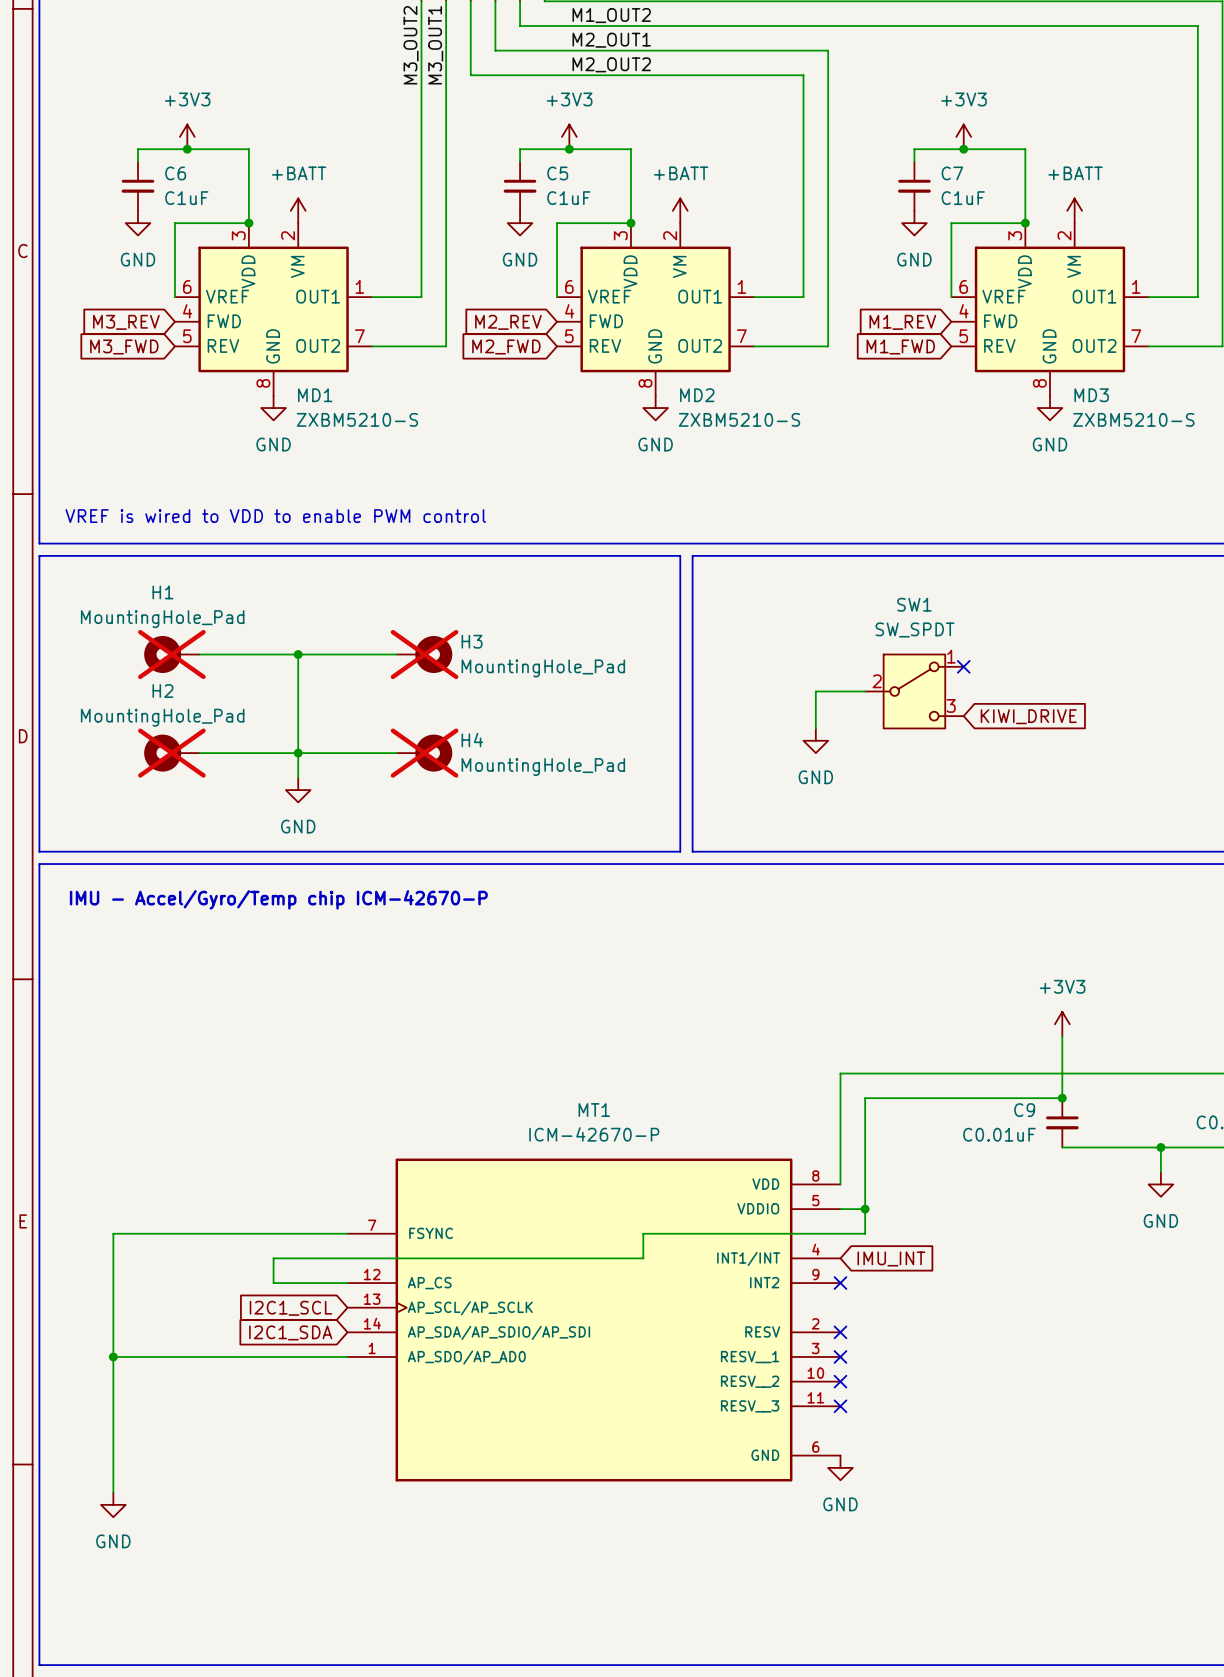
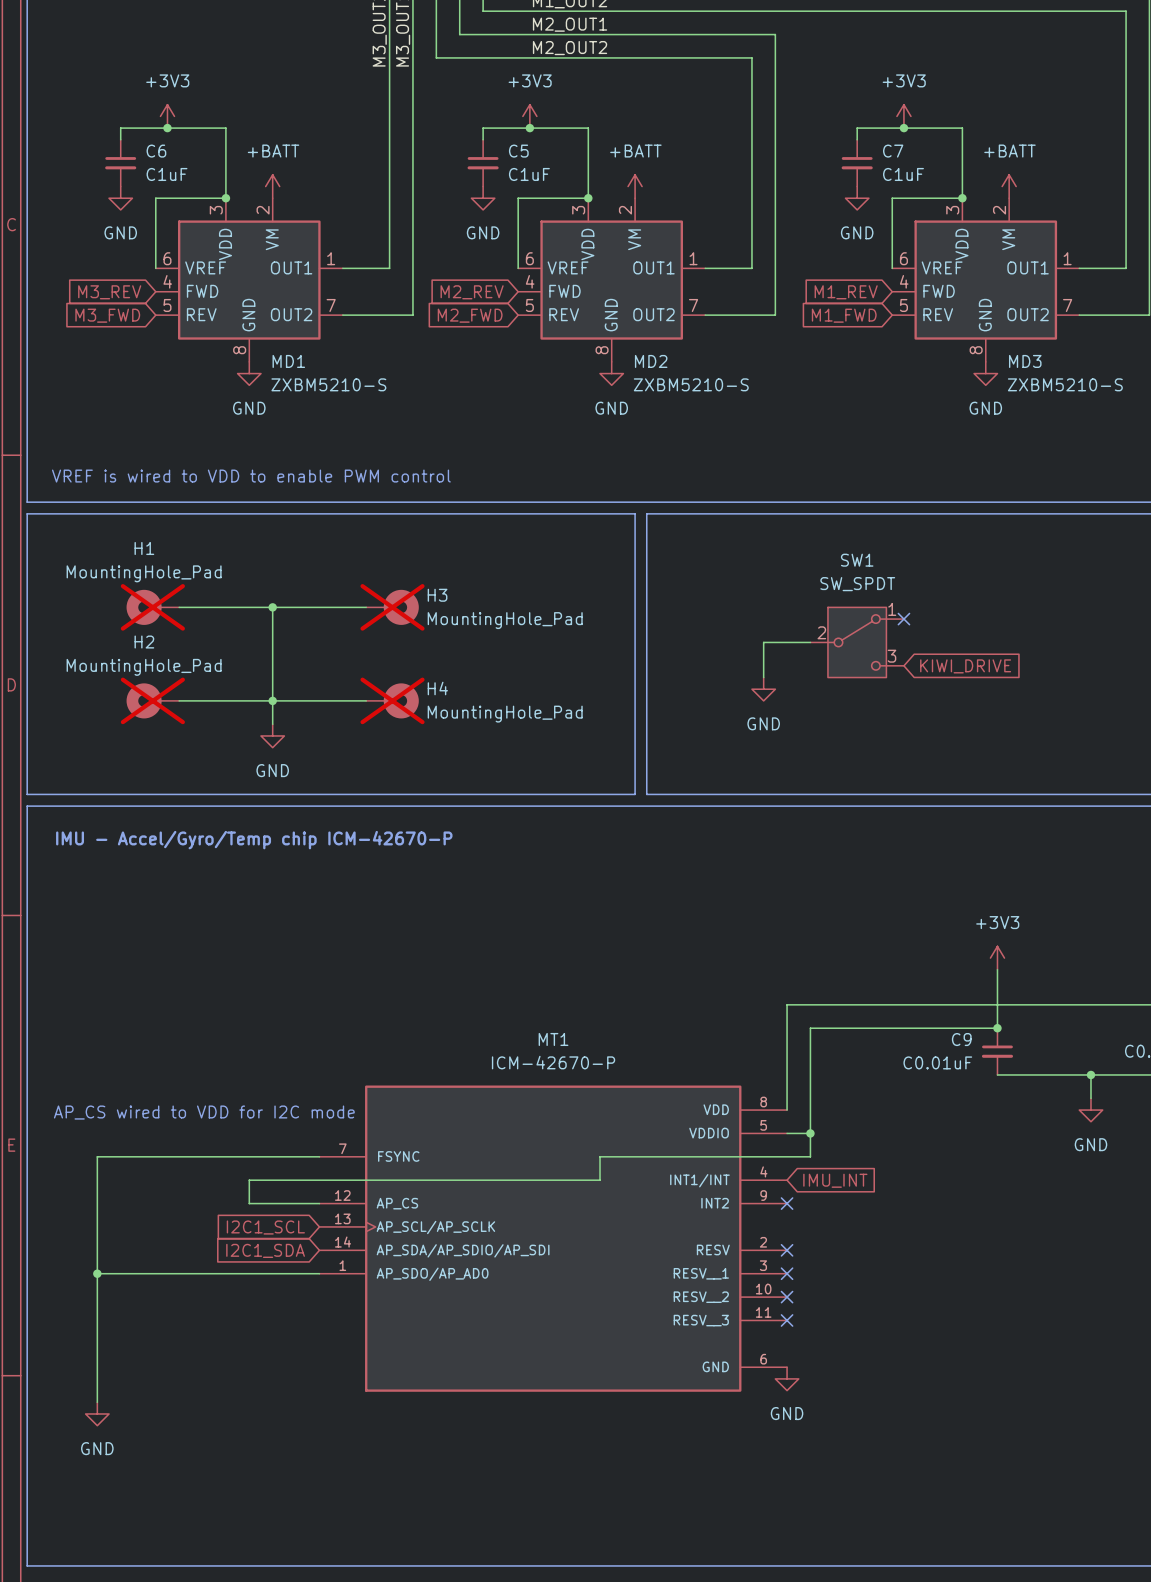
text: none -> AP_CS wired to VDD for I2C mode (204, 1112)

